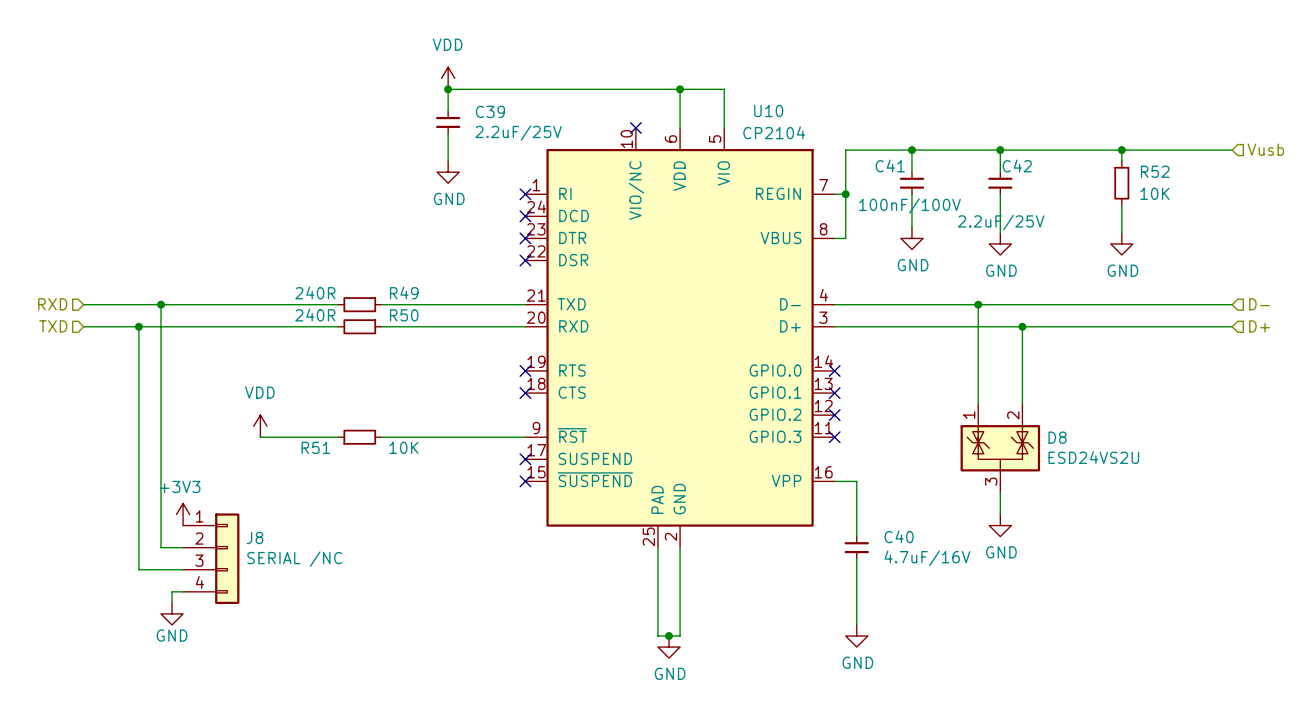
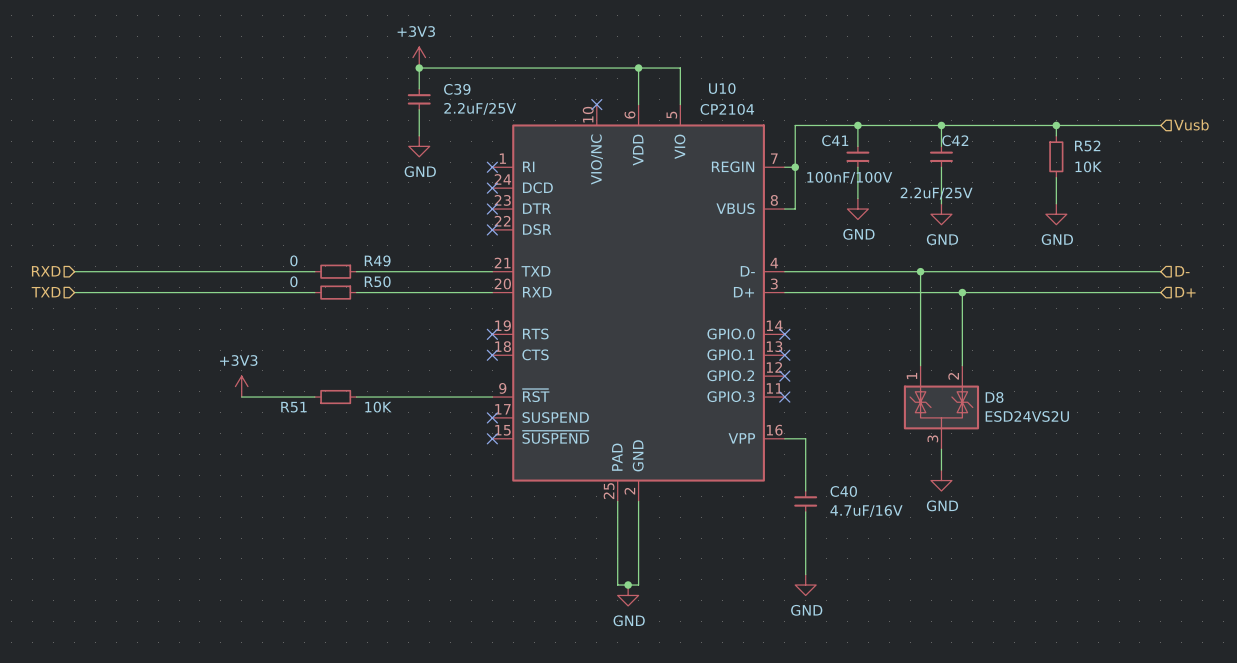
power symbol: VDD (448, 78) -> +3V3 (419, 57)
R49 value: 240R (315, 292) -> 0 (293, 260)
wire: (161, 304) (161, 547) (183, 547) -> none
junction: (161, 304) -> none
R50 value: 240R (315, 315) -> 0 (293, 281)
wire: (138, 326) (138, 569) (183, 569) -> none
junction: (138, 326) -> none
power symbol: VDD (260, 426) -> +3V3 (241, 386)
power symbol: +3V3 (183, 514) -> none
J8: SERIAL /NC (211, 558) -> none
wire: (183, 591) (172, 591) (172, 602) -> none
power symbol: GND (172, 613) -> none

